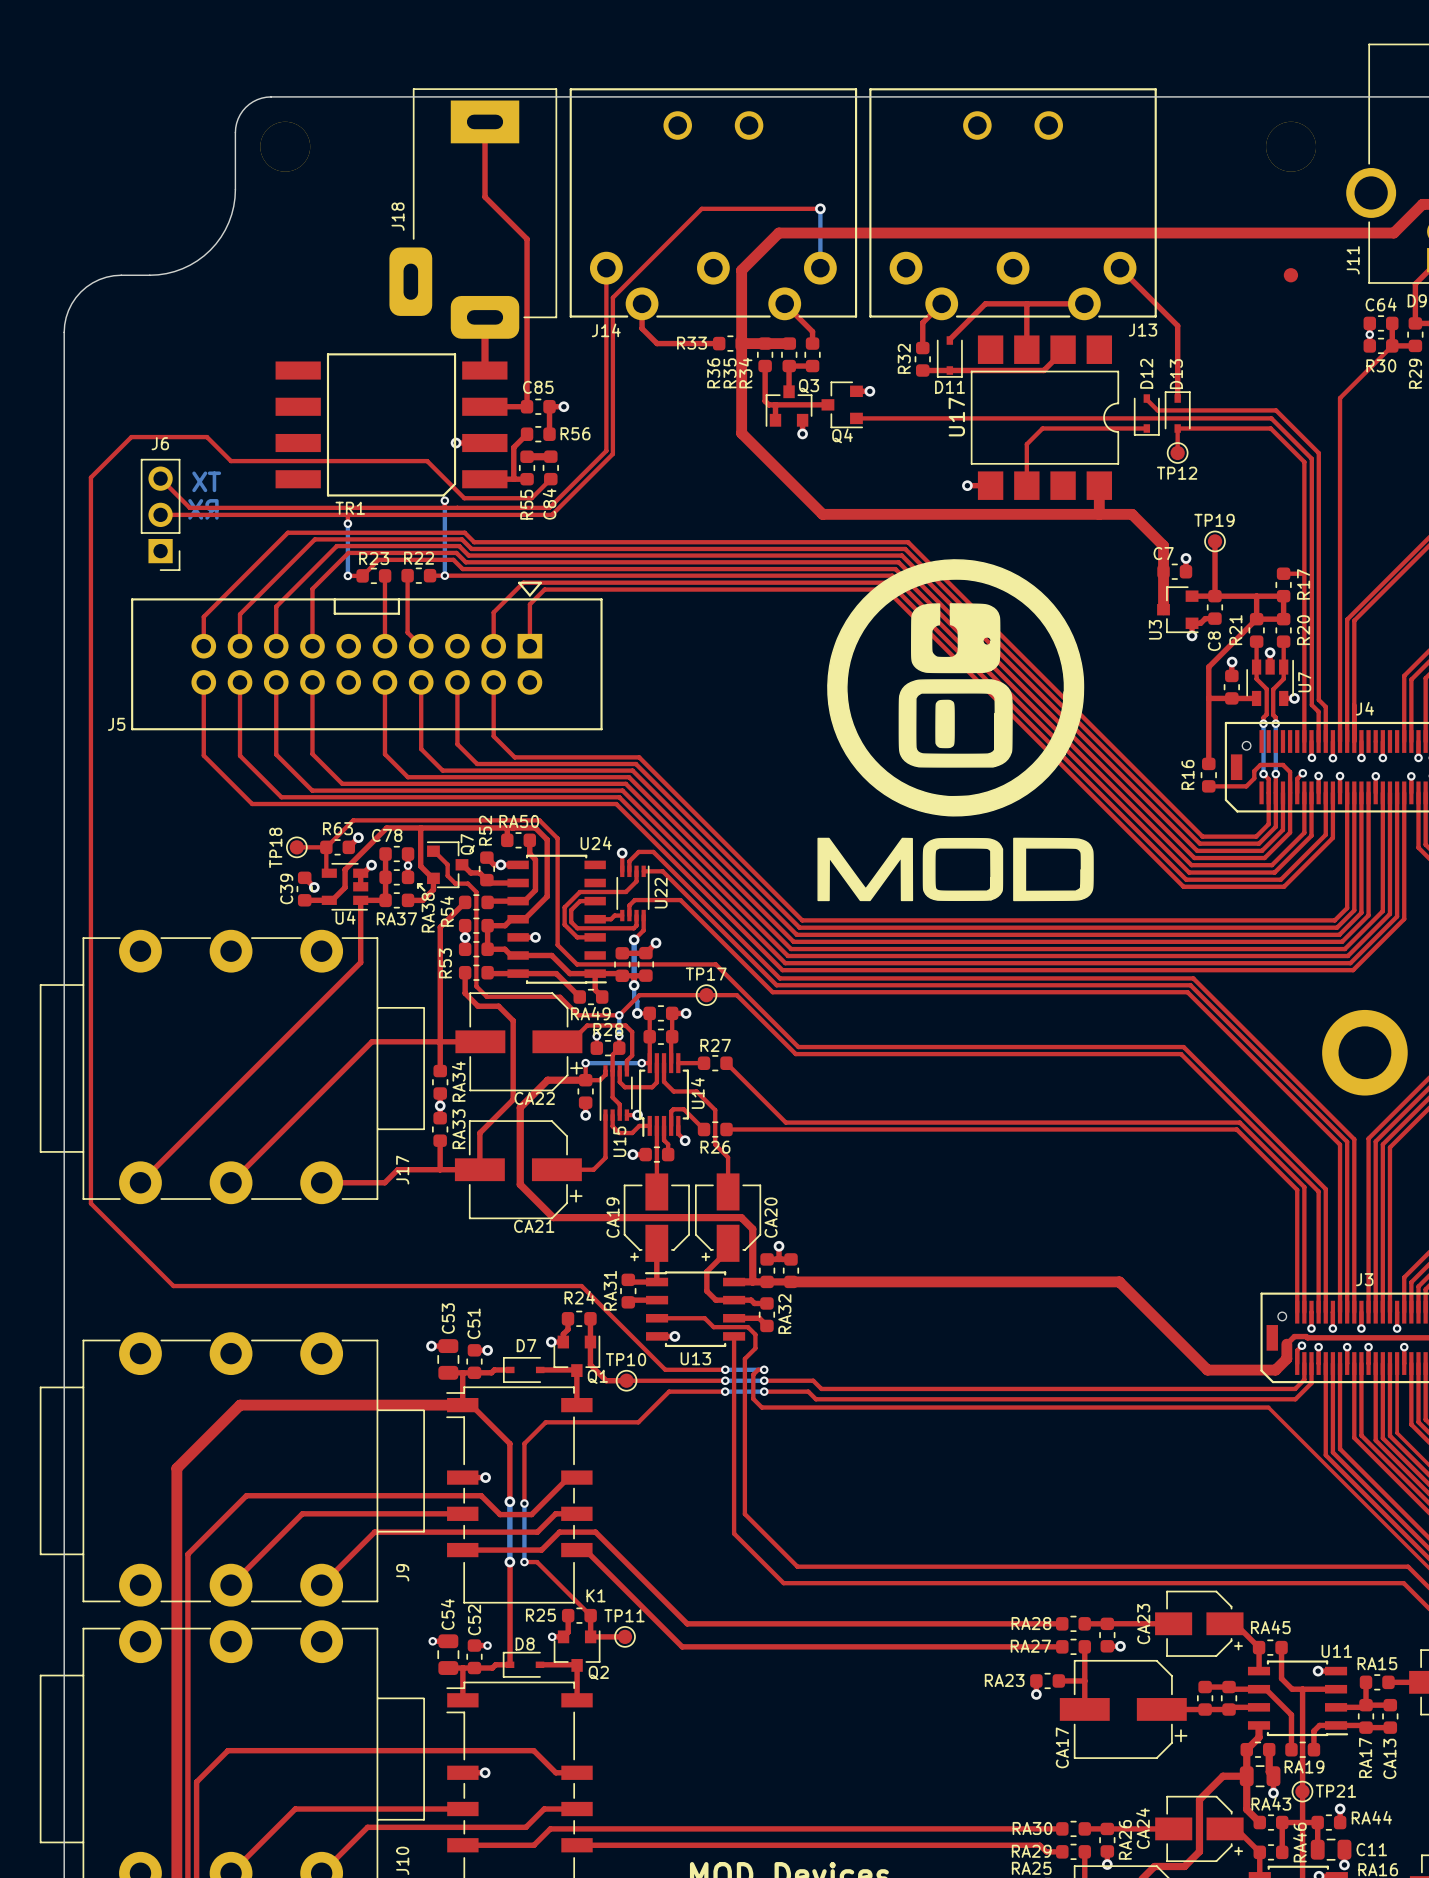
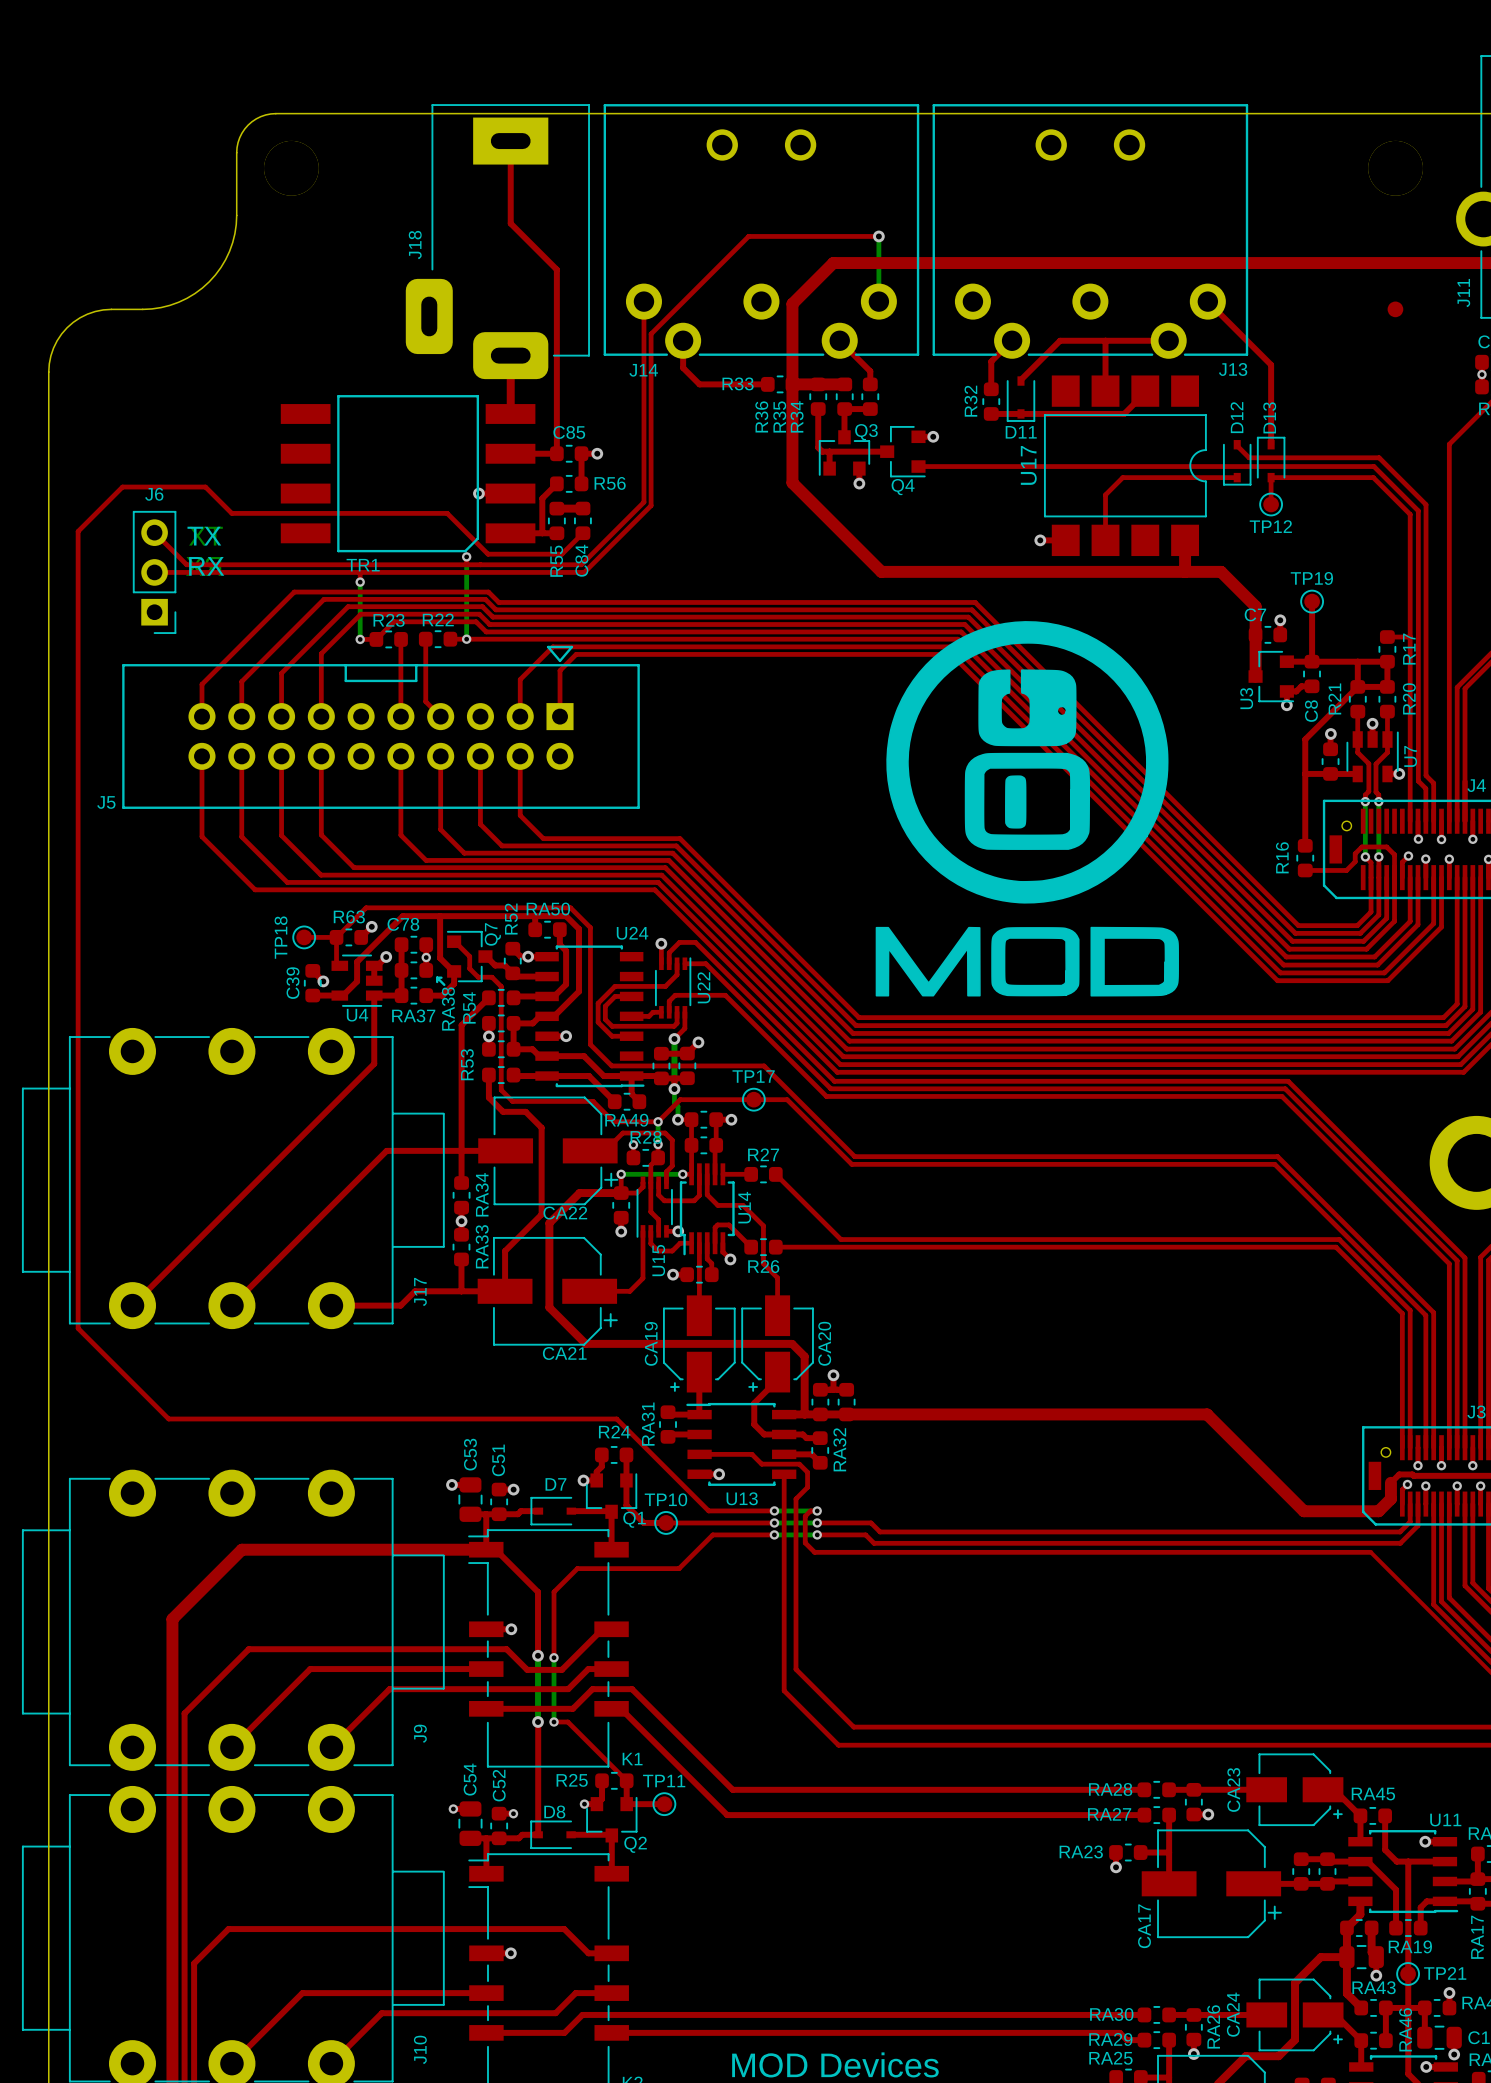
text: none -> TX (204, 536)
text: none -> RX (206, 566)

